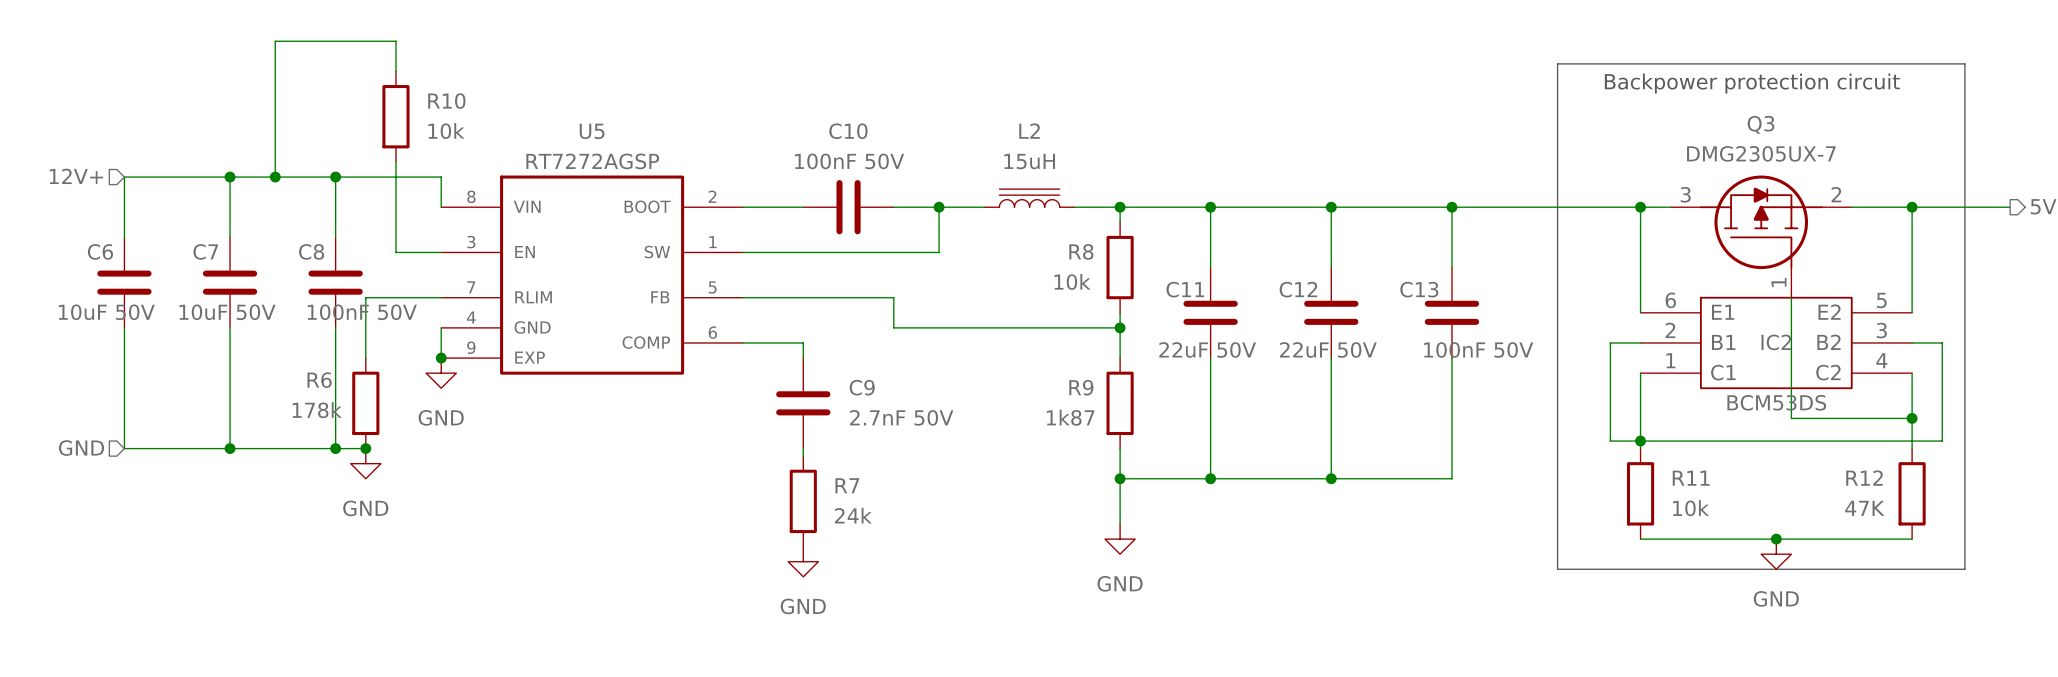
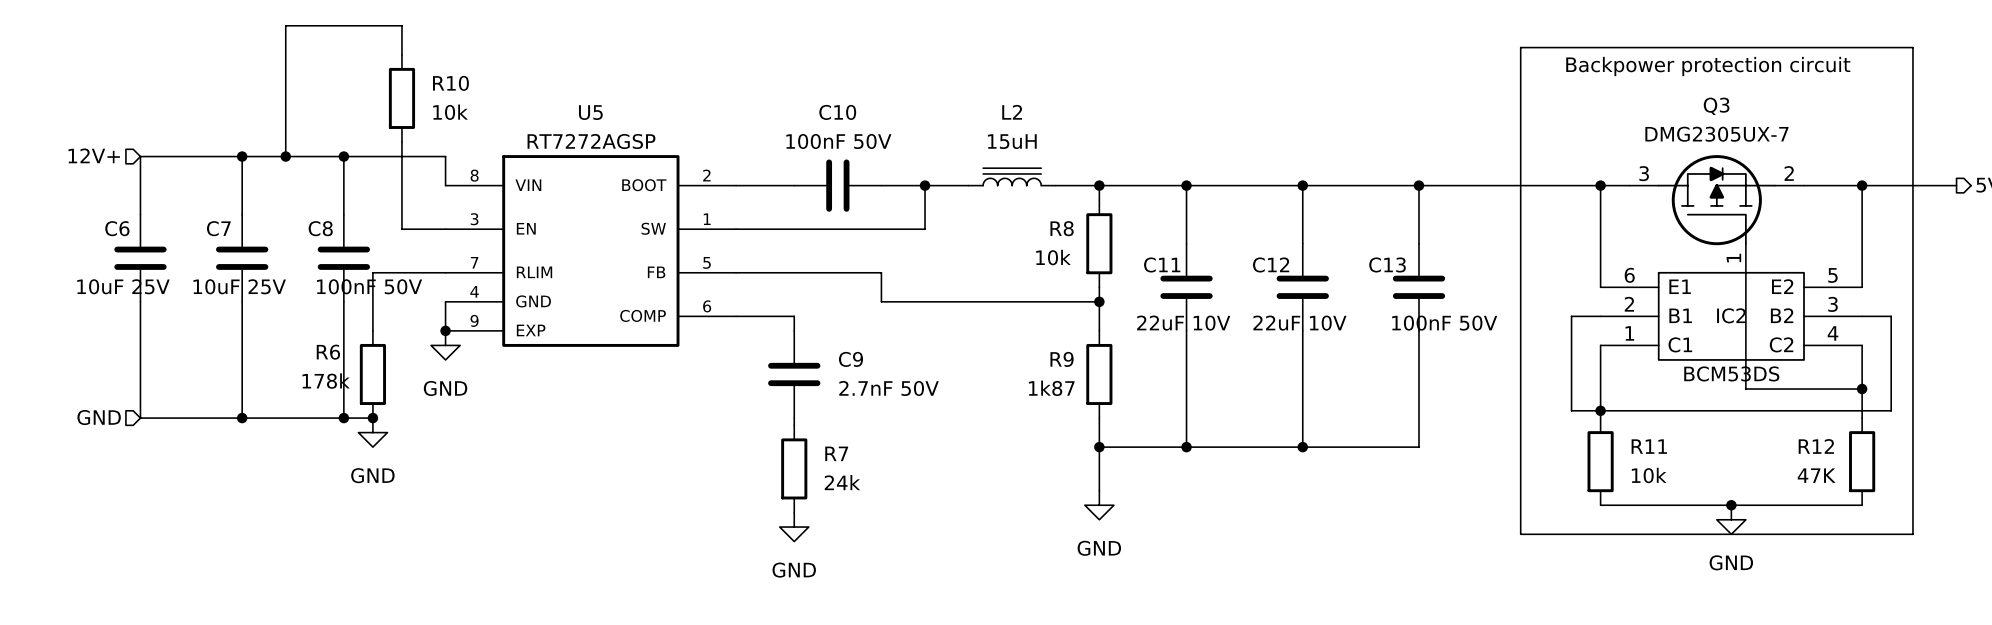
C6 value: 10uF 50V (106, 312) -> 10uF 25V (123, 286)
C7 value: 10uF 50V (227, 312) -> 10uF 25V (239, 286)
C11 value: 22uF 50V (1207, 349) -> 22uF 10V (1183, 323)
C12 value: 22uF 50V (1328, 349) -> 22uF 10V (1299, 323)

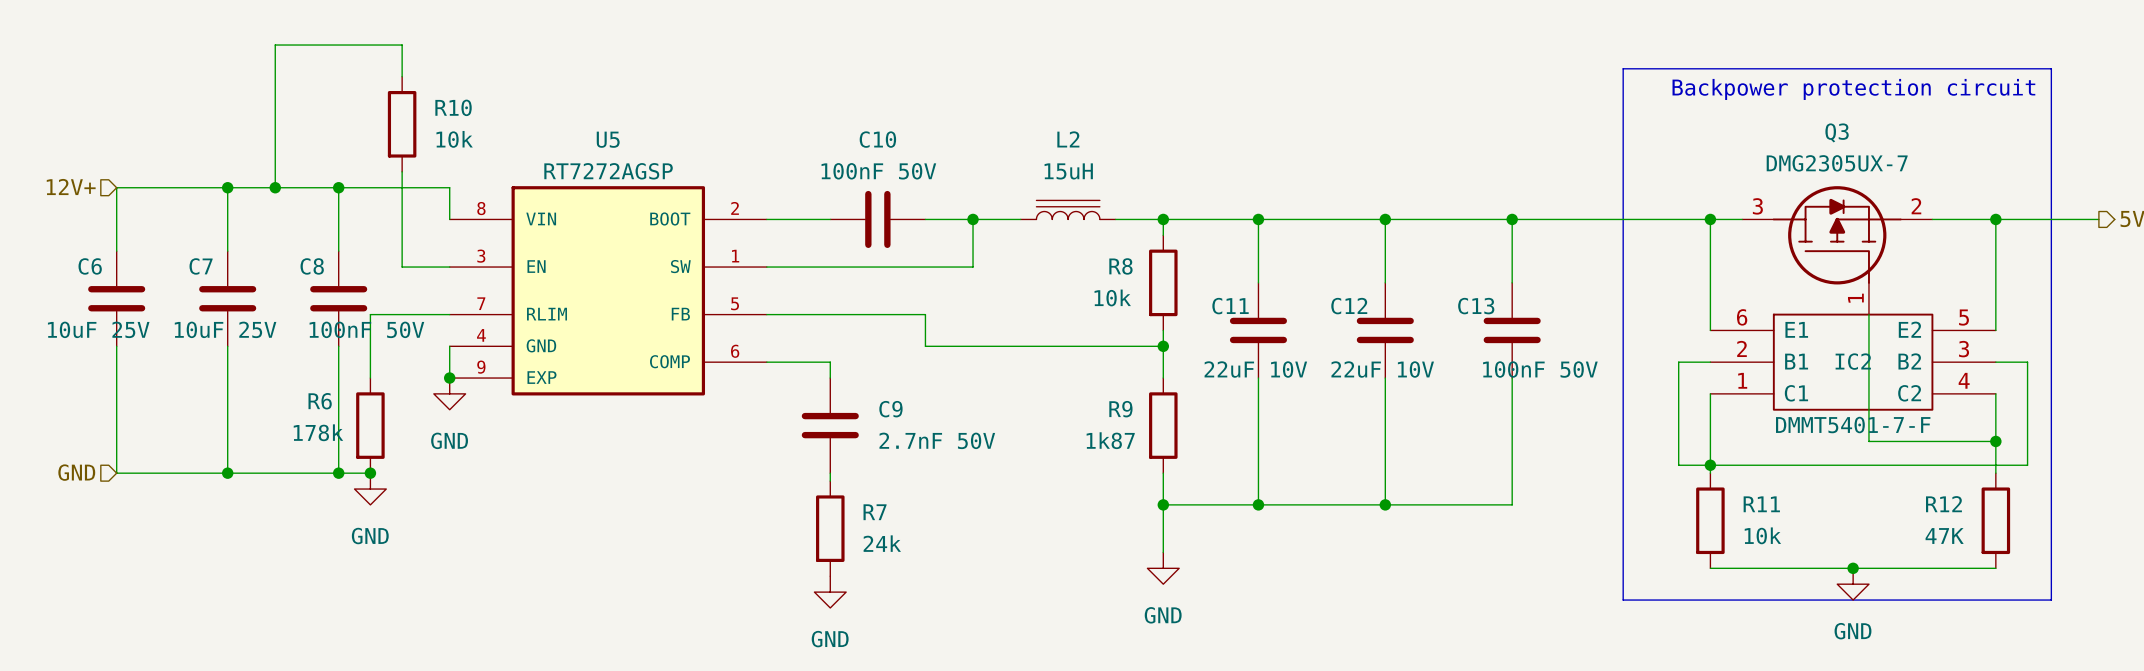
IC2 value: BCM53DS (1731, 373) -> DMMT5401-7-F (1853, 425)

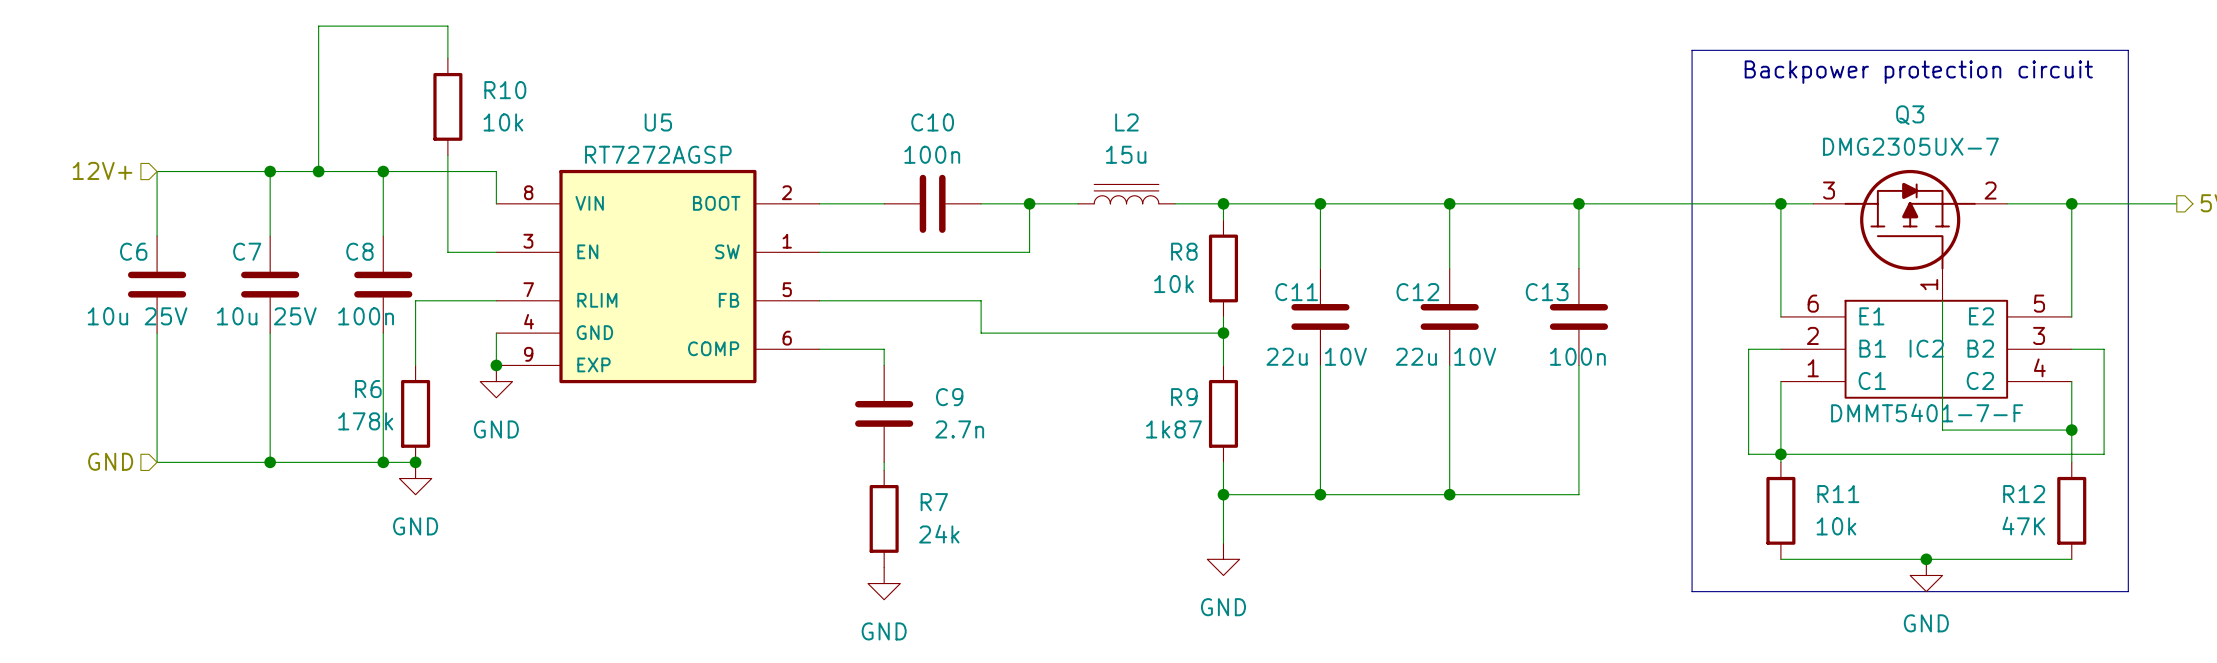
C10 value: 100nF 50V (878, 171) -> 100n (932, 154)
L2 value: 15uH (1068, 171) -> 15u (1126, 154)
C6 value: 10uF 25V (98, 329) -> 10u 25V (137, 316)
C7 value: 10uF 25V (225, 329) -> 10u 25V (266, 316)
C8 value: 100nF 50V (366, 329) -> 100n (366, 316)
C11 value: 22uF 10V (1255, 369) -> 22u 10V (1316, 356)
C12 value: 22uF 10V (1382, 369) -> 22u 10V (1445, 356)
C13 value: 100nF 50V (1540, 369) -> 100n (1577, 356)
C9 value: 2.7nF 50V (937, 440) -> 2.7n (959, 429)

